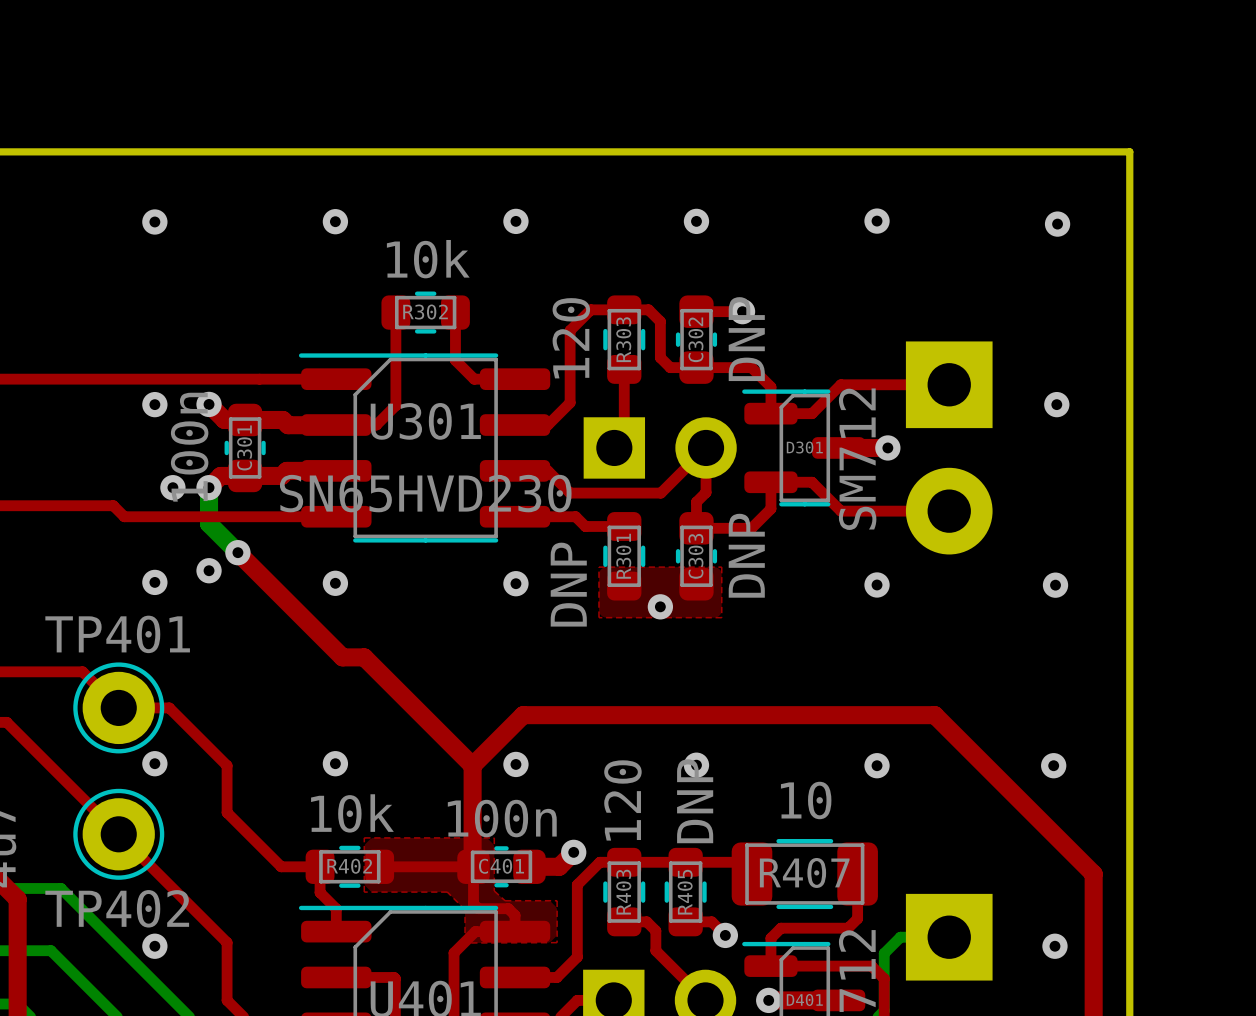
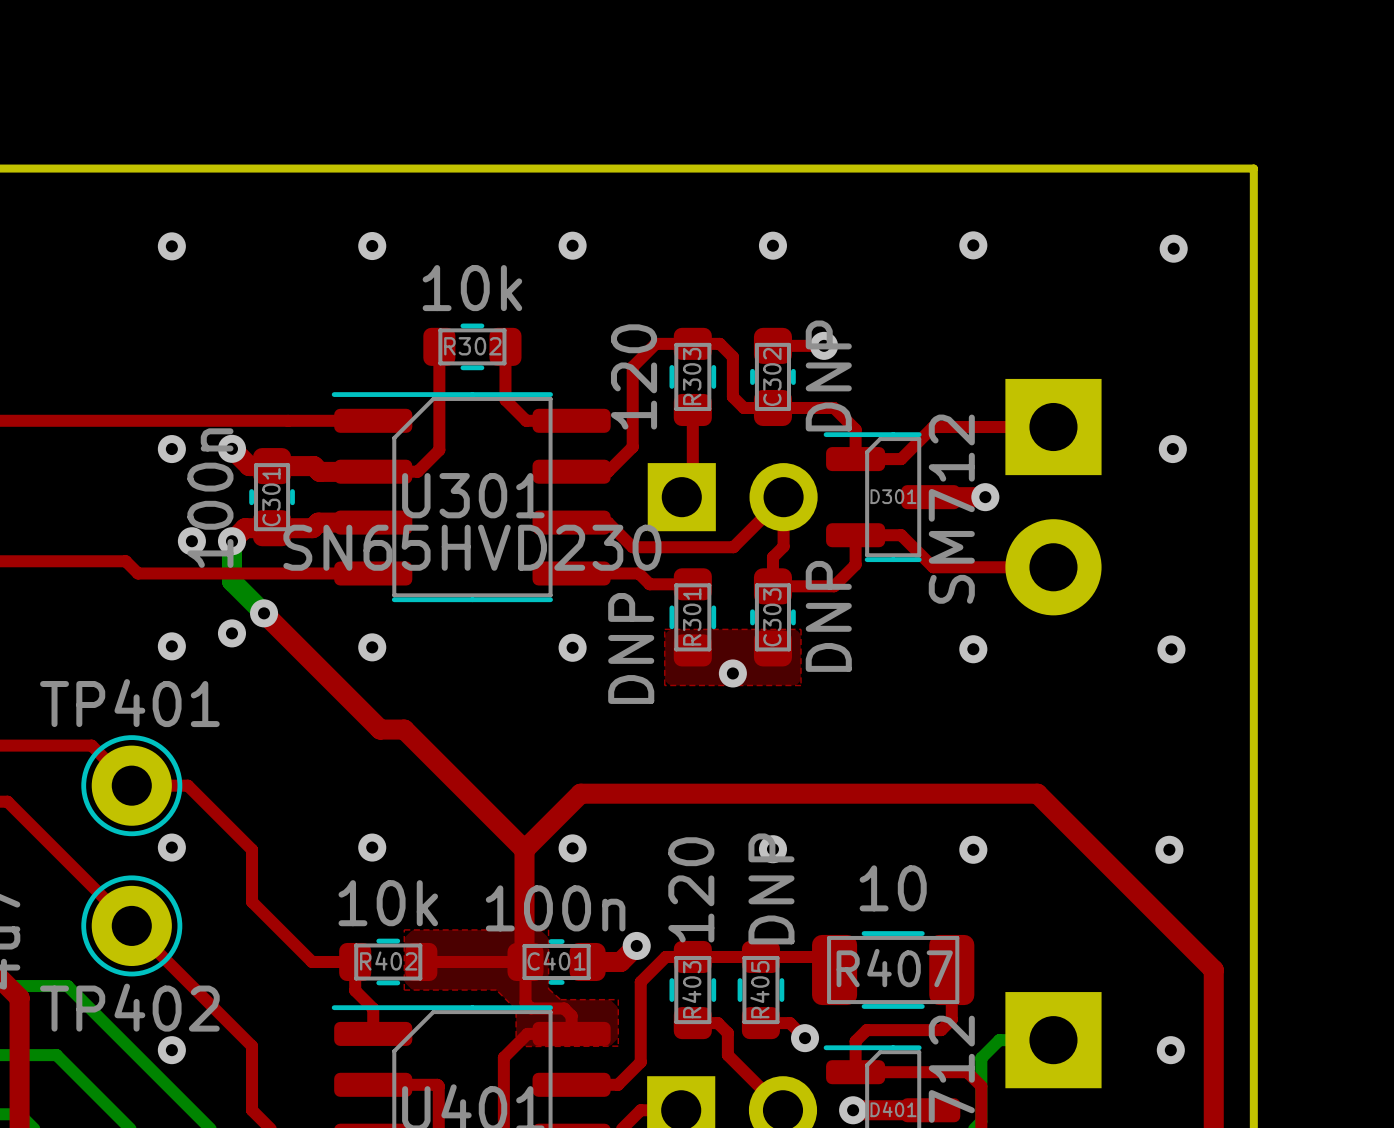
U301 name position: U301 (425, 421) -> U301 (473, 495)

